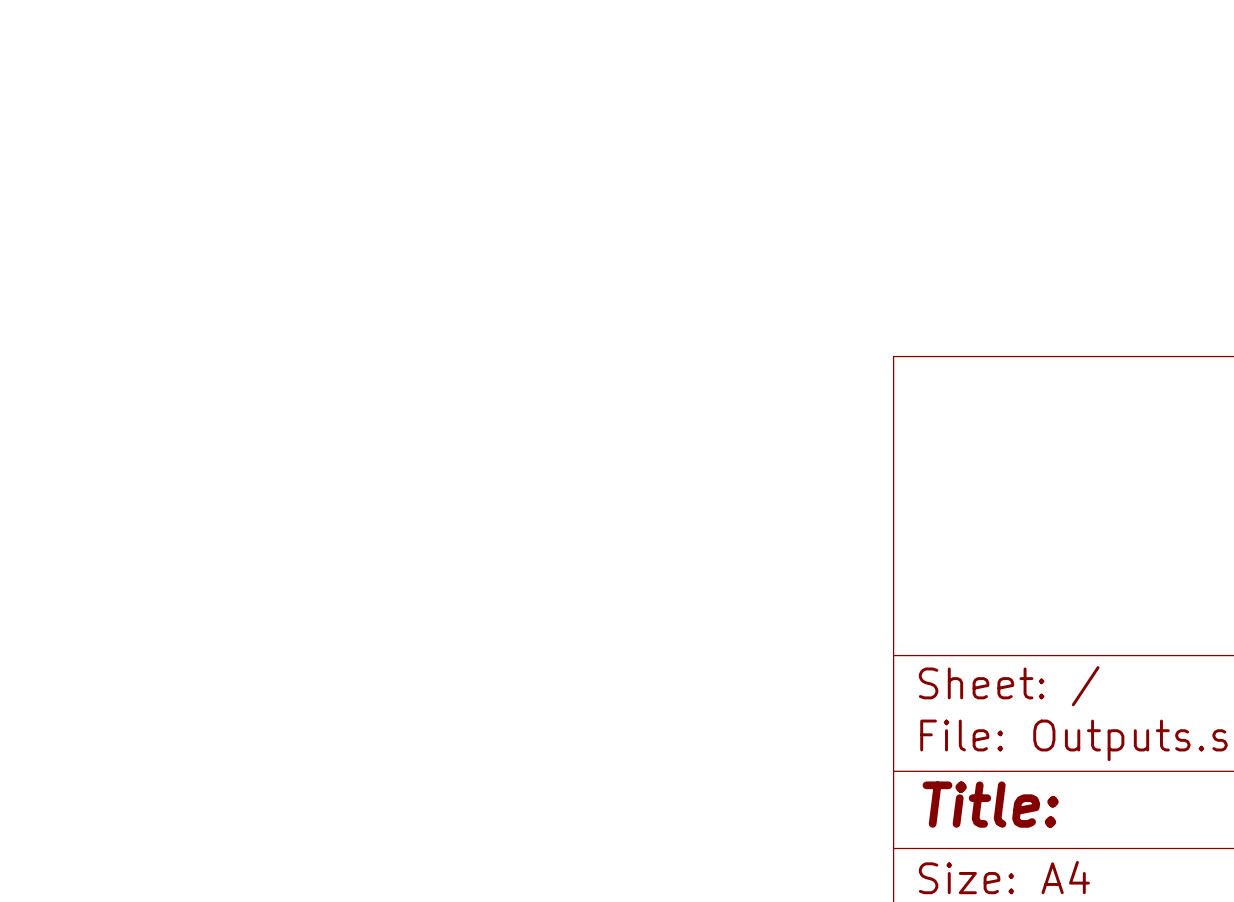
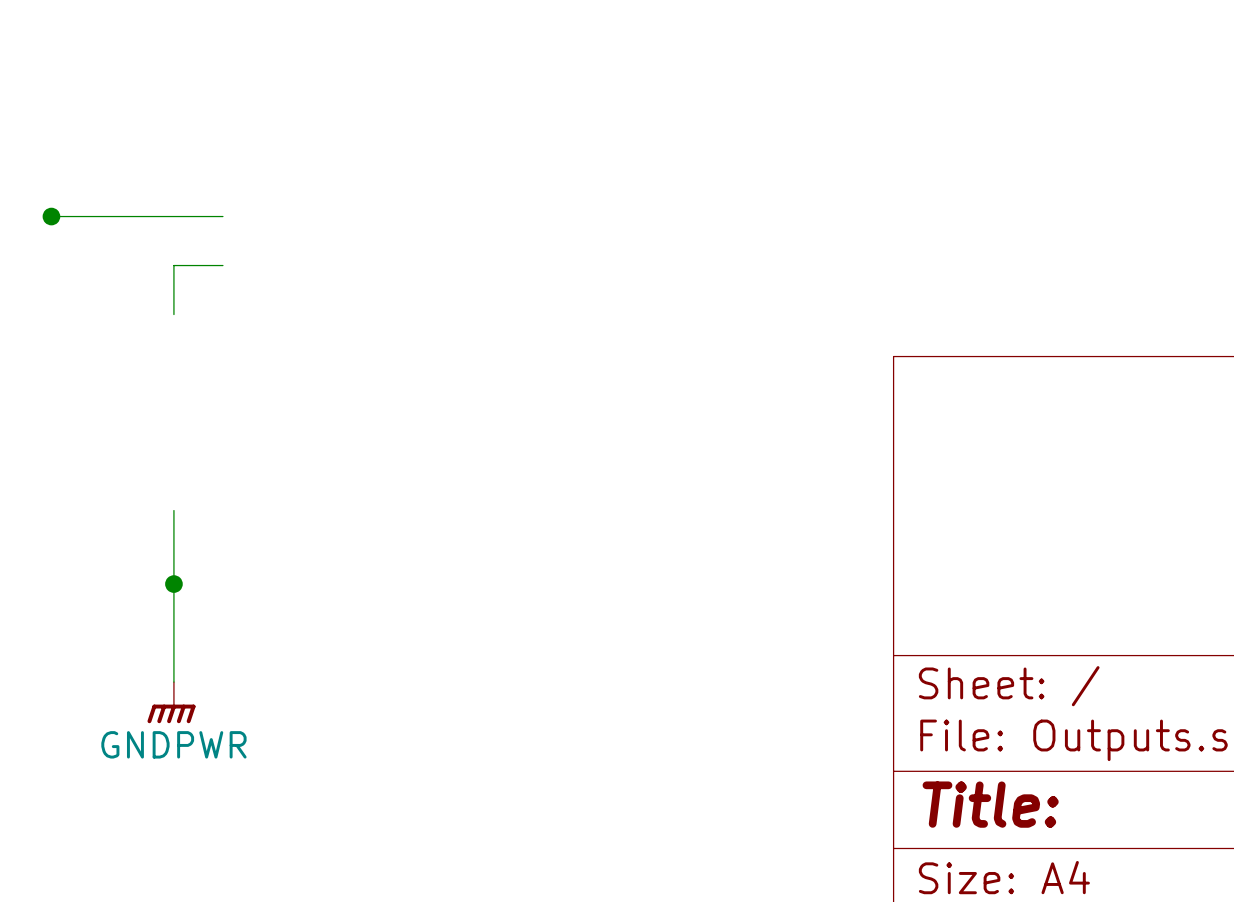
wire: none -> (51, 216) (222, 216)
junction: none -> (51, 216)
wire: none -> (222, 265) (173, 265) (173, 314)
wire: none -> (173, 510) (173, 682)
junction: none -> (173, 584)
power symbol: none -> GNDPWR (171, 702)

